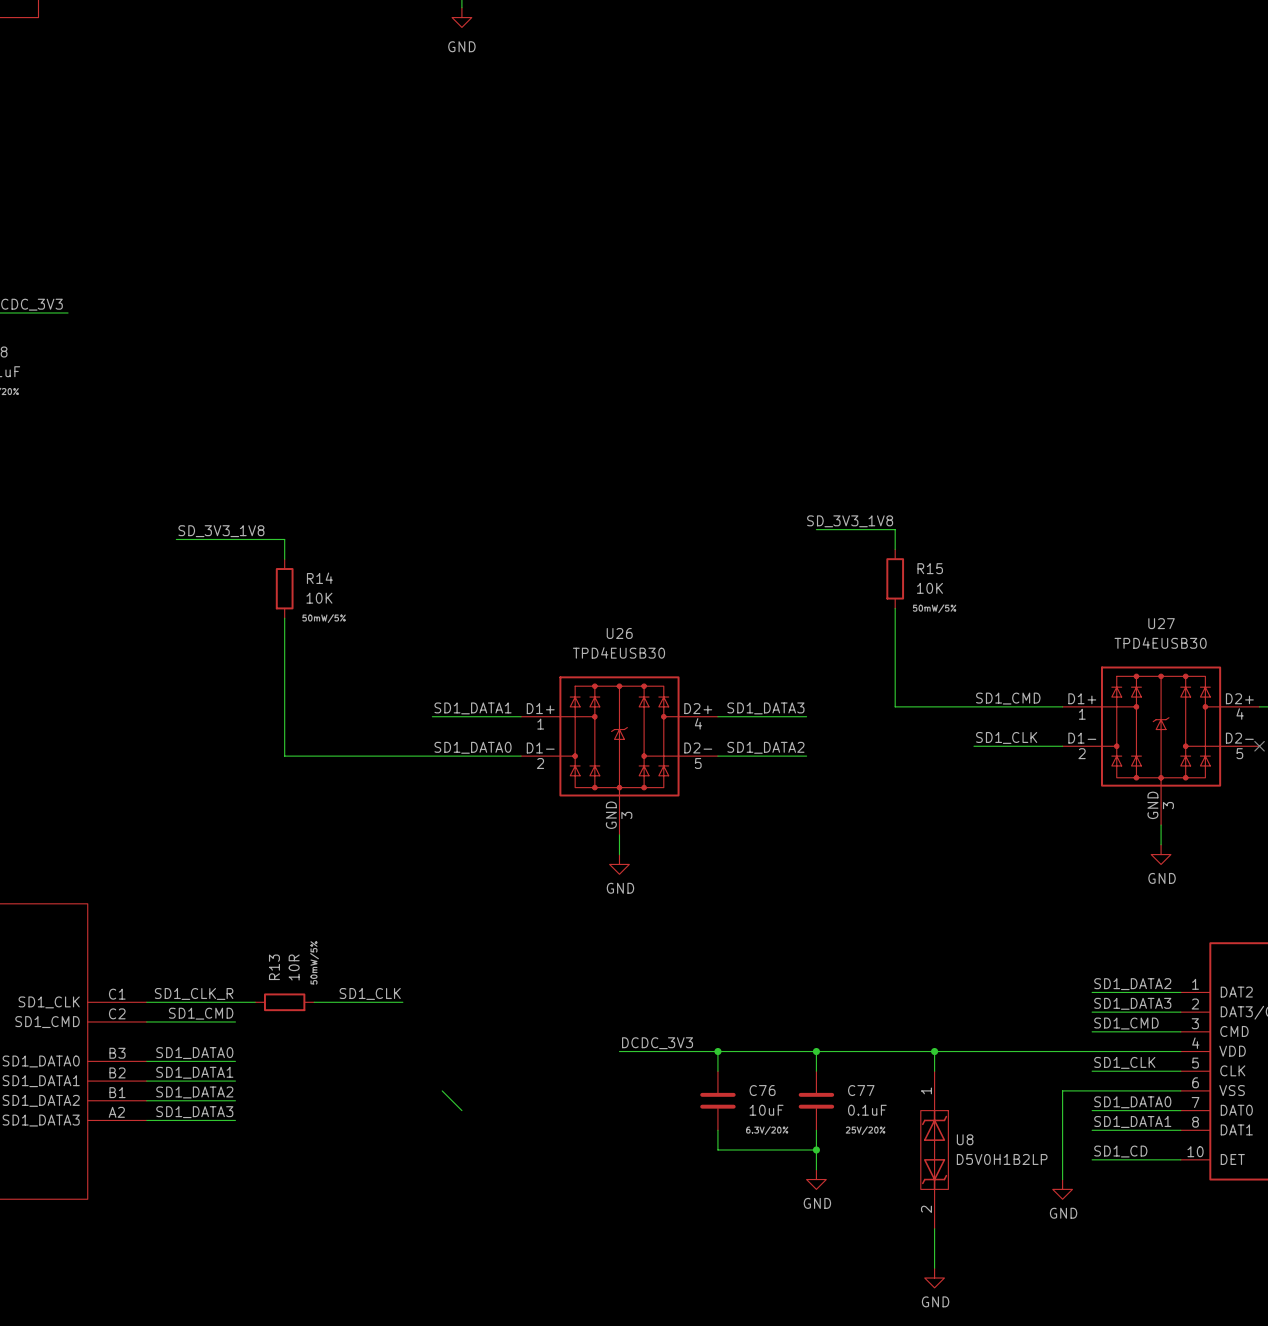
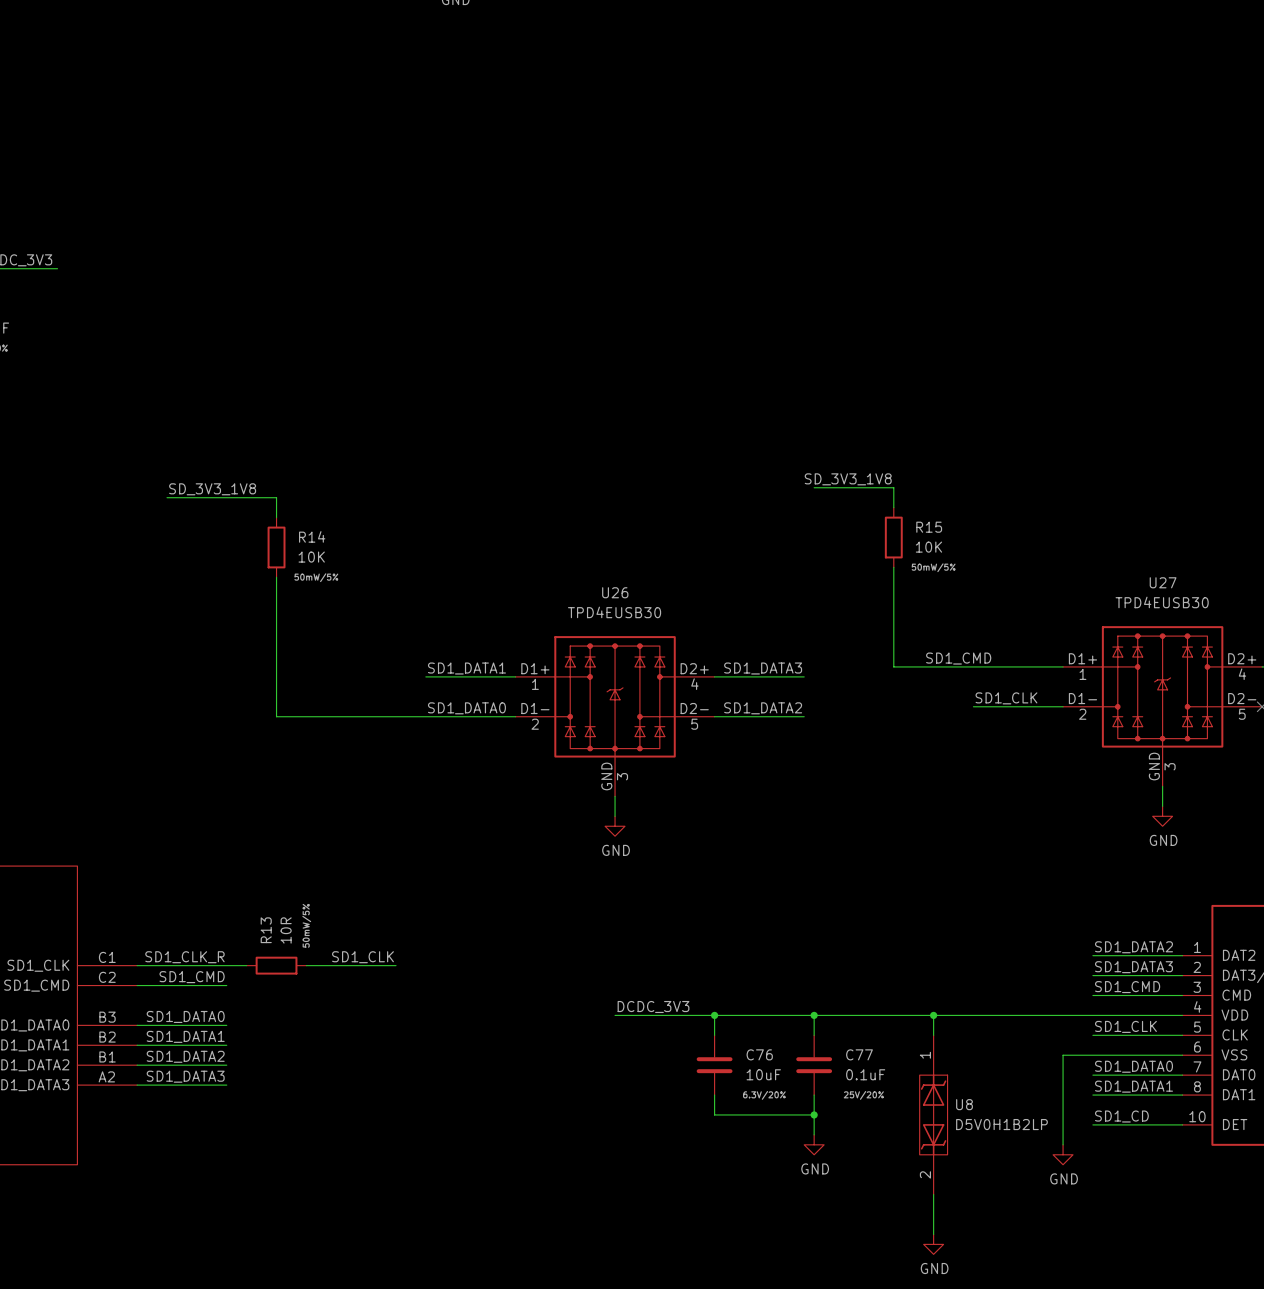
label position: SD1_CMD (1008, 698) -> SD1_CMD (958, 658)
wire: (442, 1090) (461, 1110) -> none

